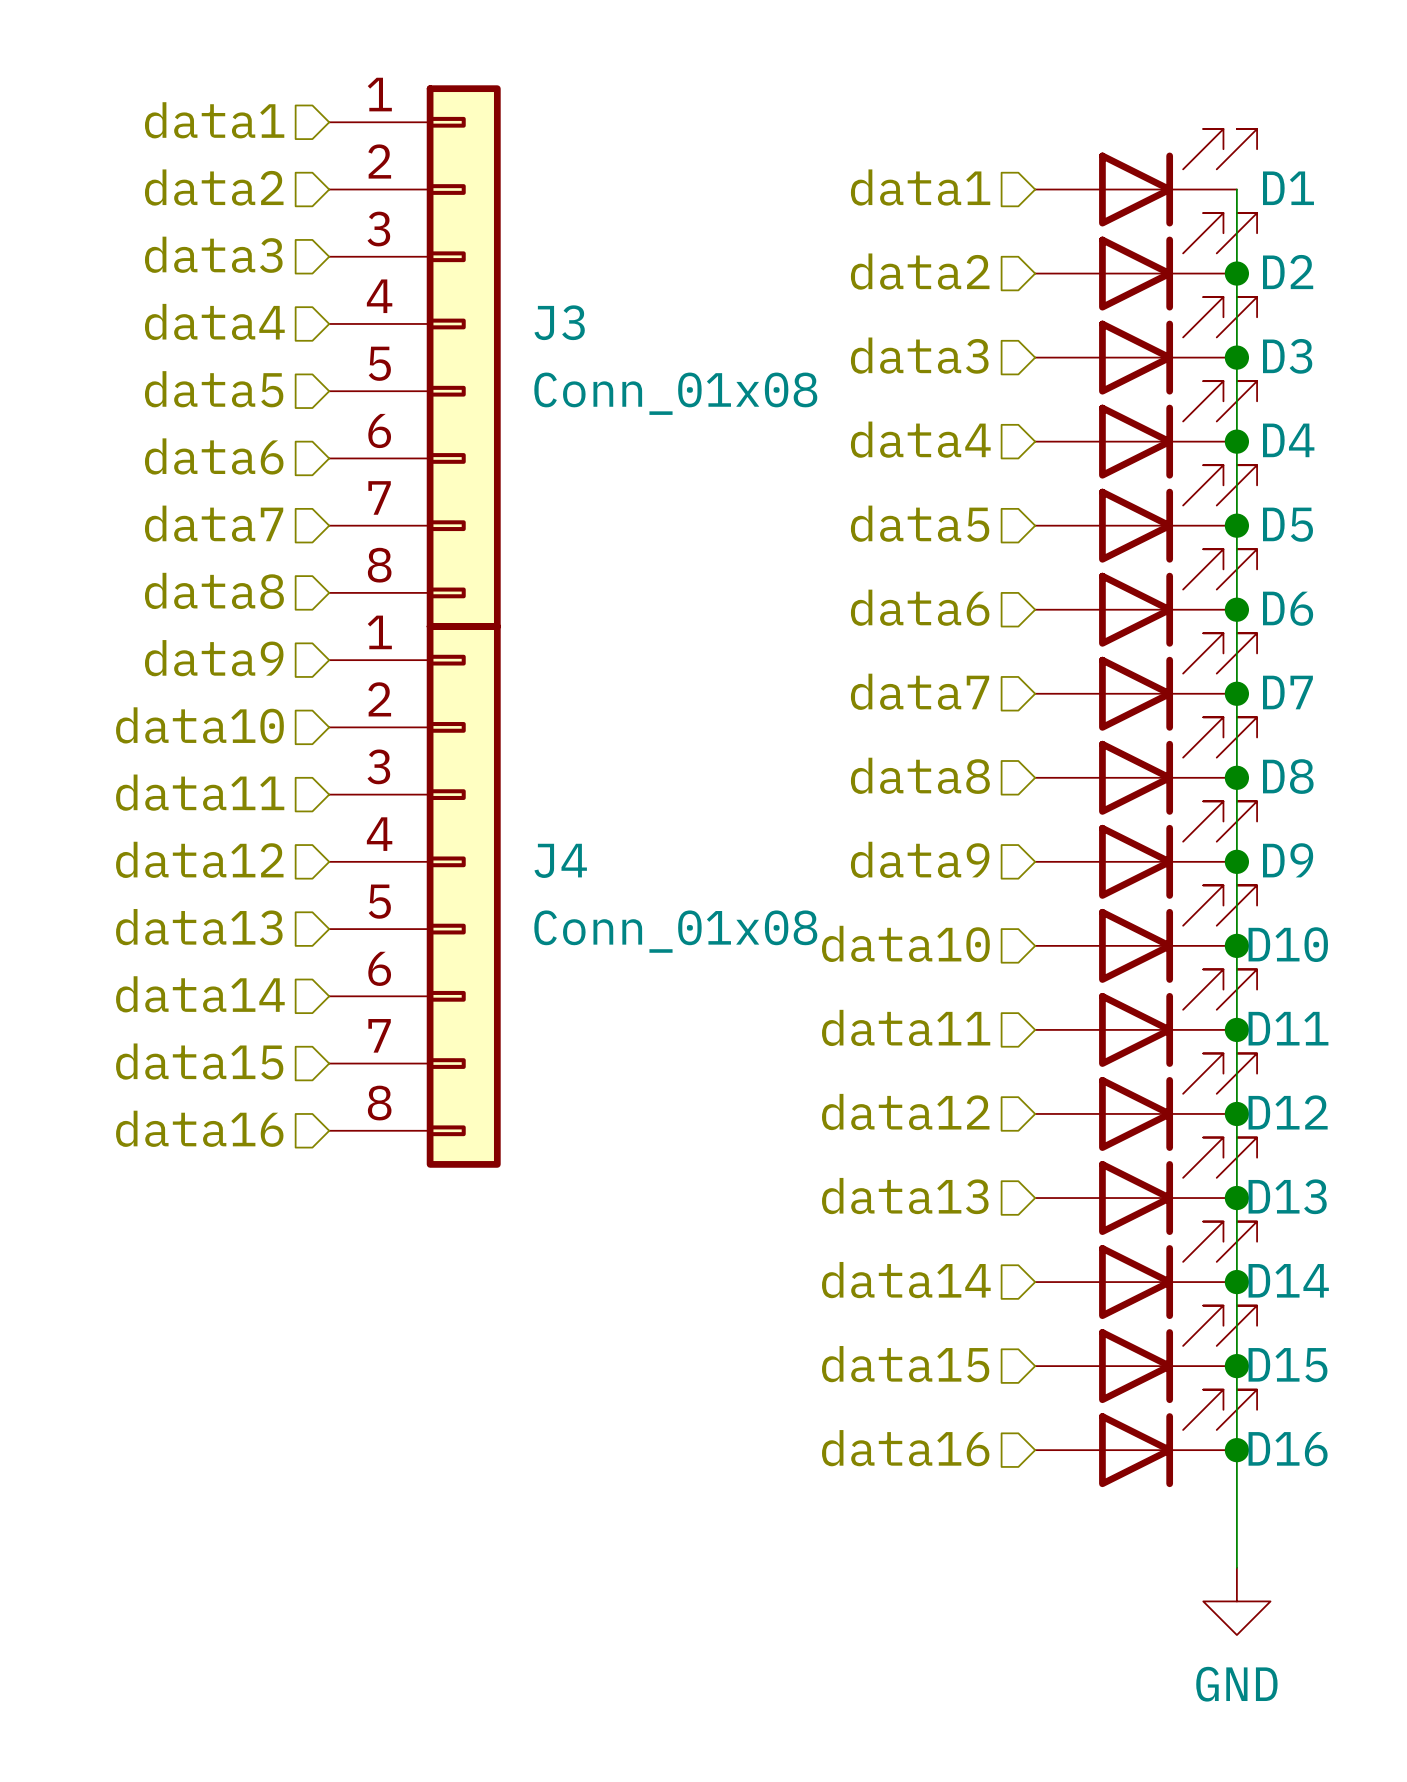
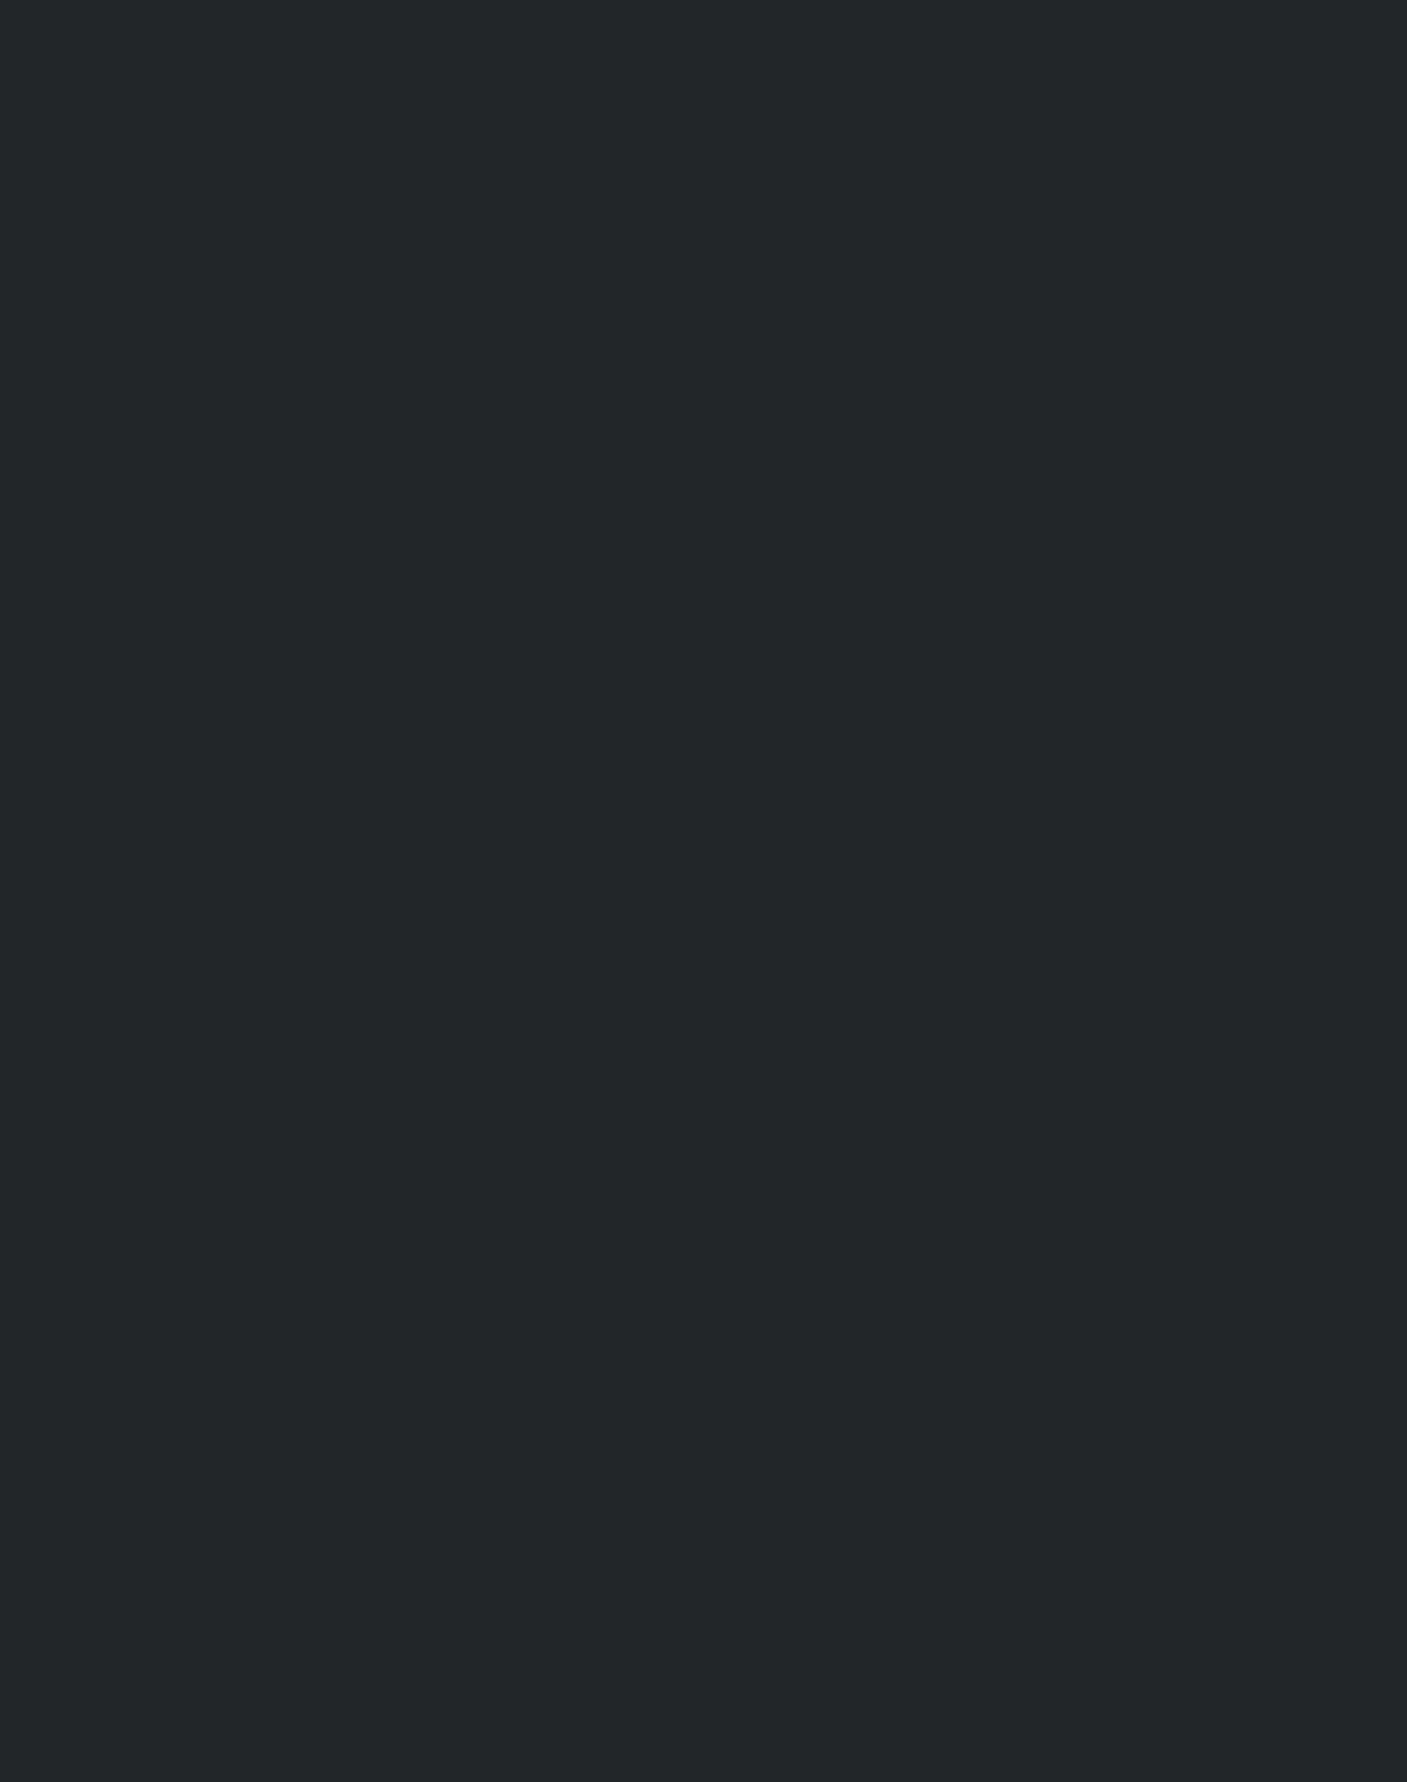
hierarchical label: data1 (214, 120) -> none
D1: (1146, 177) -> none
hierarchical label: data2 (214, 187) -> none
hierarchical label: data1 (920, 187) -> none
wire: (1236, 189) (1236, 1567) -> none
hierarchical label: data3 (213, 254) -> none
D2: (1146, 261) -> none
hierarchical label: data2 (920, 271) -> none
junction: (1236, 273) -> none
hierarchical label: data4 (214, 322) -> none
D3: (1146, 345) -> none
hierarchical label: data3 (919, 355) -> none
J3: Conn_01x08 (414, 357) -> none
junction: (1236, 357) -> none
hierarchical label: data5 (214, 389) -> none
D4: (1146, 429) -> none
hierarchical label: data4 (920, 439) -> none
junction: (1236, 441) -> none
hierarchical label: data6 (214, 456) -> none
D5: (1146, 513) -> none
hierarchical label: data7 (214, 523) -> none
hierarchical label: data5 (920, 523) -> none
junction: (1236, 525) -> none
hierarchical label: data8 (214, 590) -> none
D6: (1146, 597) -> none
hierarchical label: data6 (920, 607) -> none
junction: (1236, 609) -> none
hierarchical label: data9 (214, 658) -> none
D7: (1146, 682) -> none
hierarchical label: data7 (920, 691) -> none
junction: (1236, 693) -> none
hierarchical label: data10 (199, 725) -> none
D8: (1146, 766) -> none
hierarchical label: data8 (920, 775) -> none
junction: (1236, 777) -> none
hierarchical label: data11 (200, 792) -> none
D9: (1146, 850) -> none
hierarchical label: data12 (199, 859) -> none
hierarchical label: data9 (920, 859) -> none
junction: (1236, 861) -> none
J4: Conn_01x08 (414, 895) -> none
hierarchical label: data13 (199, 927) -> none
D10: (1146, 934) -> none
hierarchical label: data10 (905, 943) -> none
junction: (1236, 945) -> none
hierarchical label: data14 (200, 994) -> none
D11: (1146, 1018) -> none
hierarchical label: data11 (906, 1027) -> none
junction: (1236, 1029) -> none
hierarchical label: data15 (199, 1061) -> none
D12: (1146, 1102) -> none
hierarchical label: data12 (905, 1111) -> none
junction: (1236, 1113) -> none
hierarchical label: data16 (199, 1128) -> none
D13: (1146, 1186) -> none
hierarchical label: data13 (905, 1196) -> none
junction: (1236, 1198) -> none
D14: (1146, 1270) -> none
hierarchical label: data14 (906, 1280) -> none
junction: (1236, 1282) -> none
D15: (1146, 1354) -> none
hierarchical label: data15 (905, 1364) -> none
junction: (1236, 1366) -> none
D16: (1146, 1438) -> none
hierarchical label: data16 (905, 1448) -> none
junction: (1236, 1450) -> none
power symbol: GND (1236, 1601) -> none

